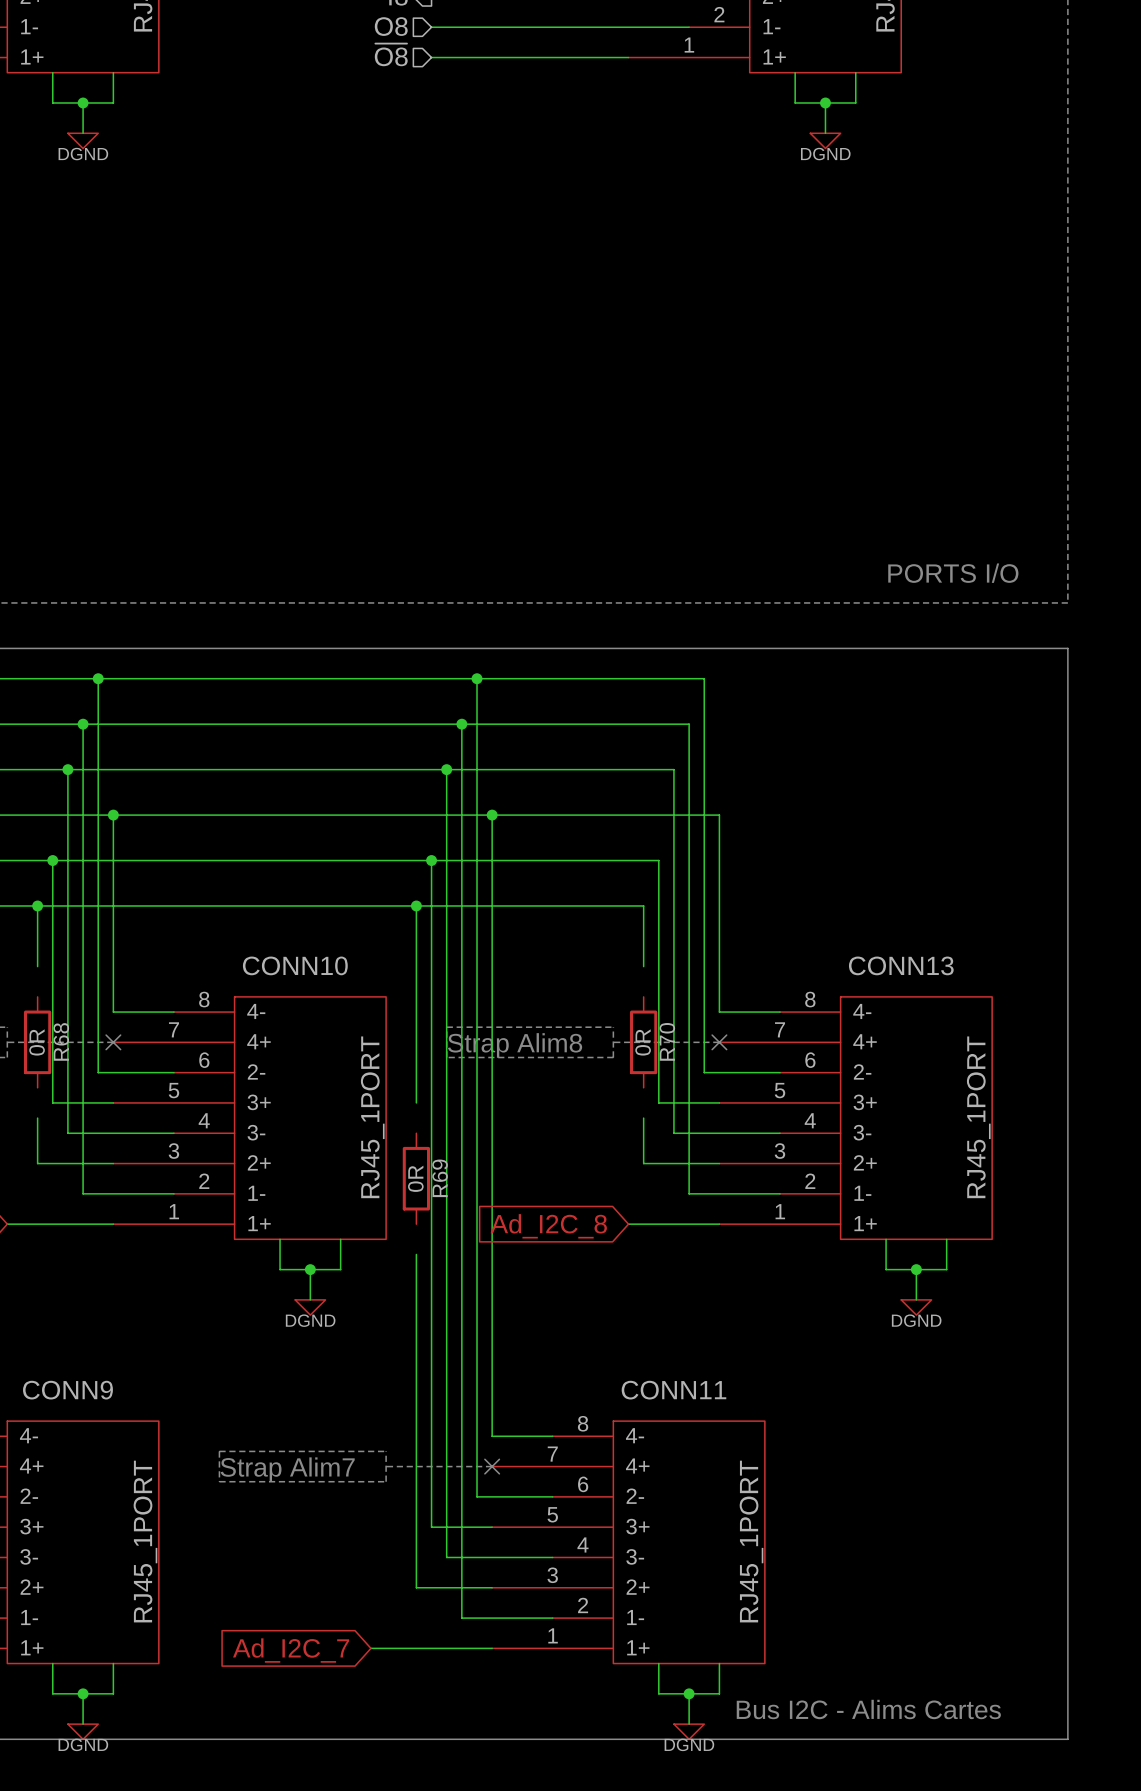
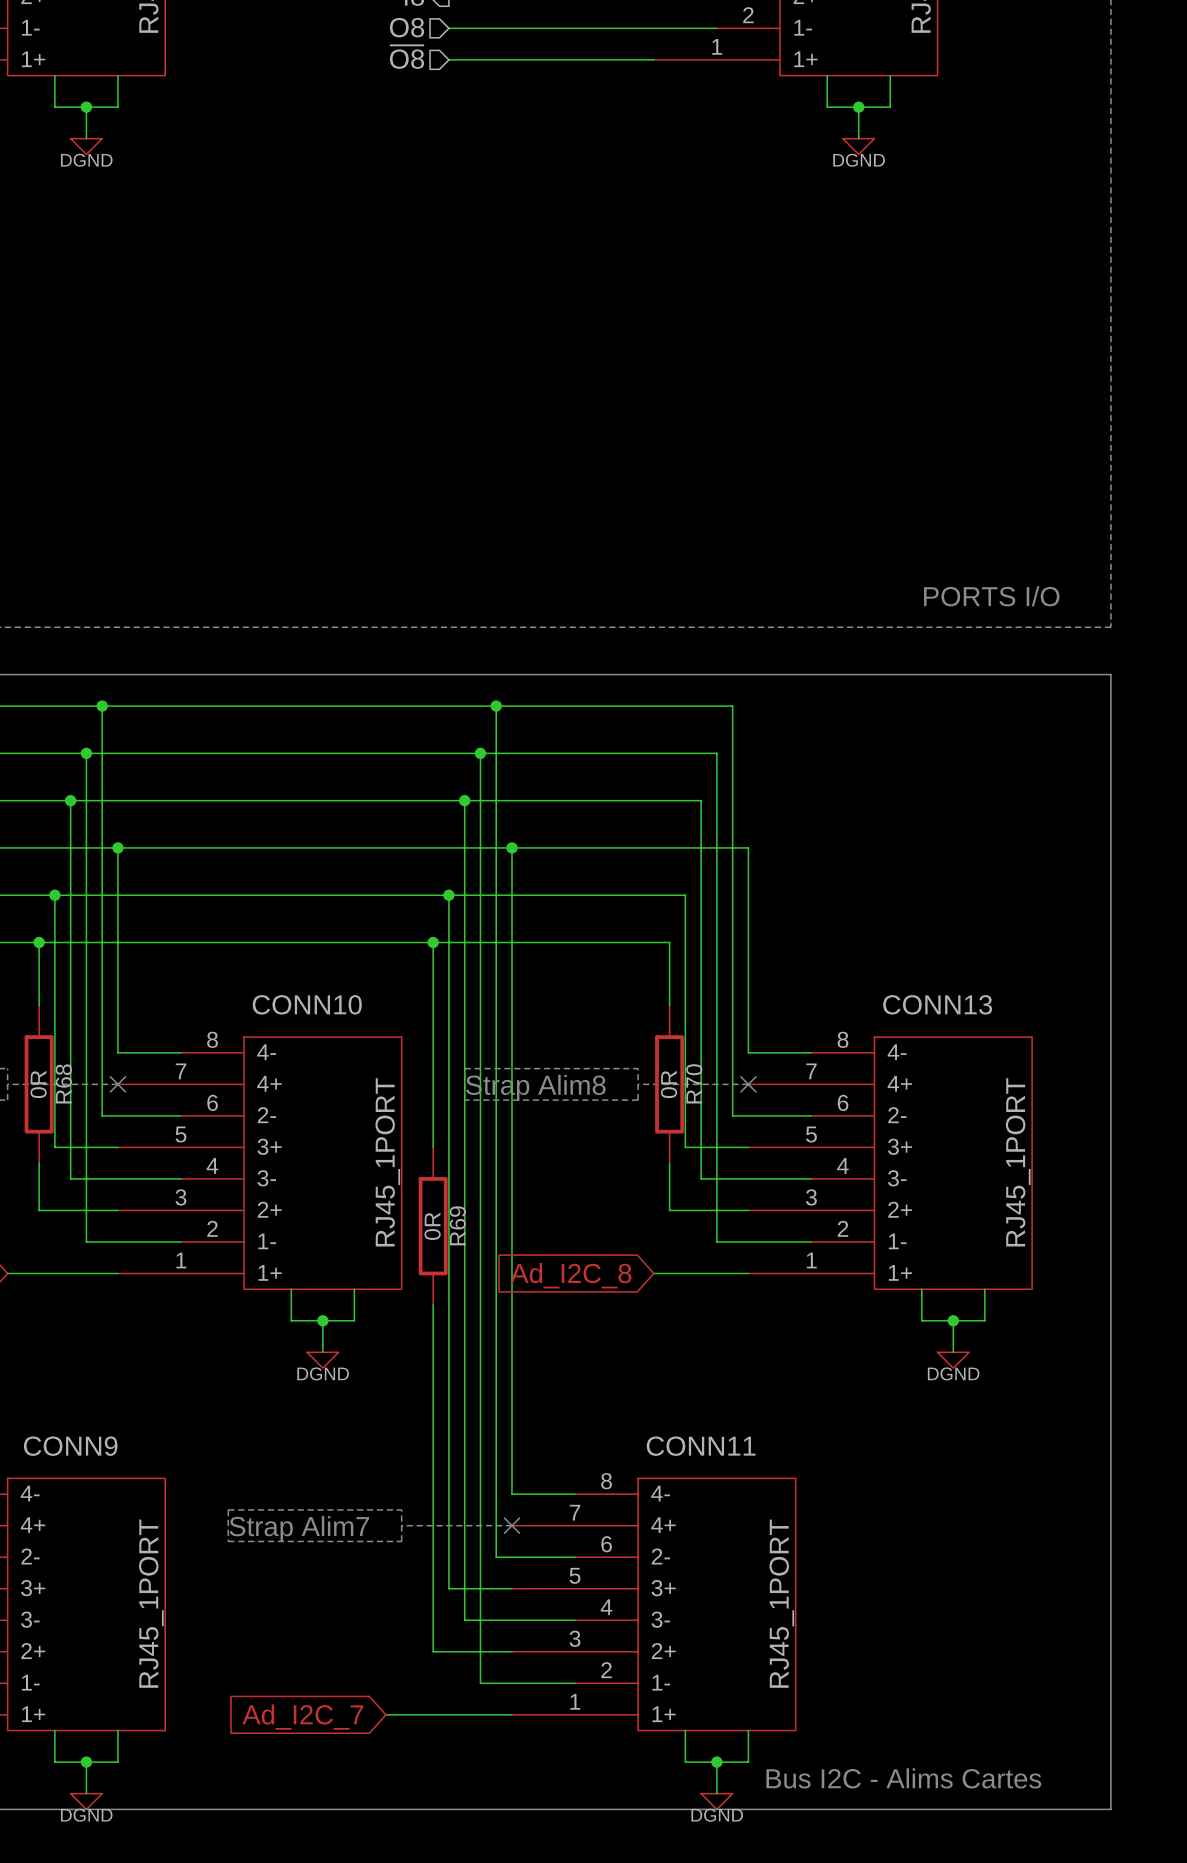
R68 symbol: [23, 996, 52, 1088] -> [24, 1005, 54, 1164]
R70 symbol: [630, 996, 658, 1088] -> [655, 1005, 685, 1164]
R69 symbol: [402, 1133, 431, 1225] -> [418, 1147, 448, 1306]

